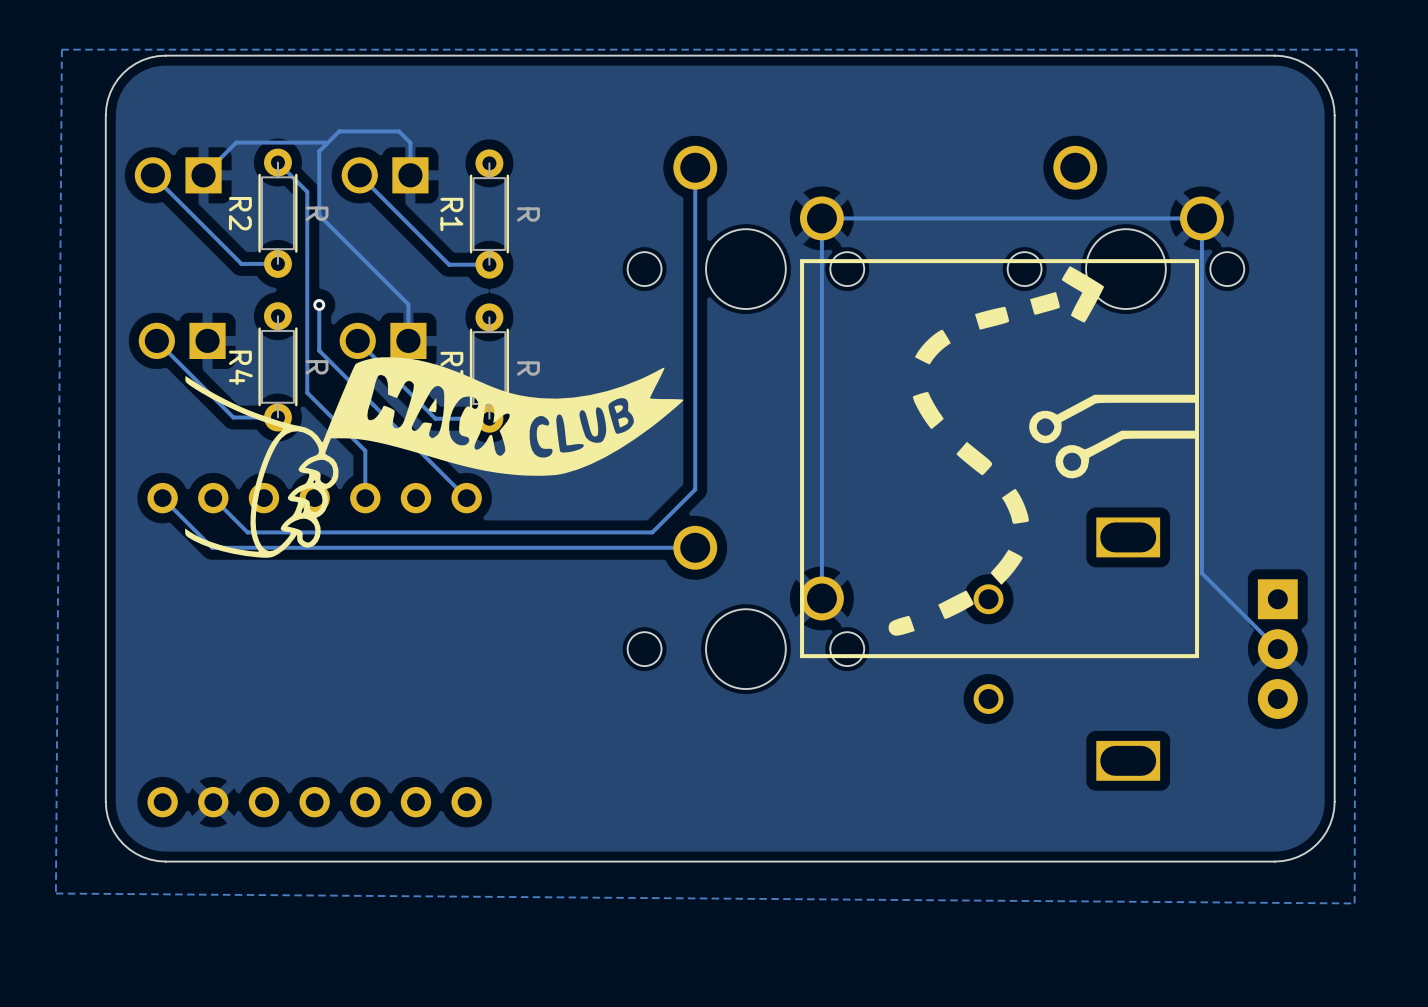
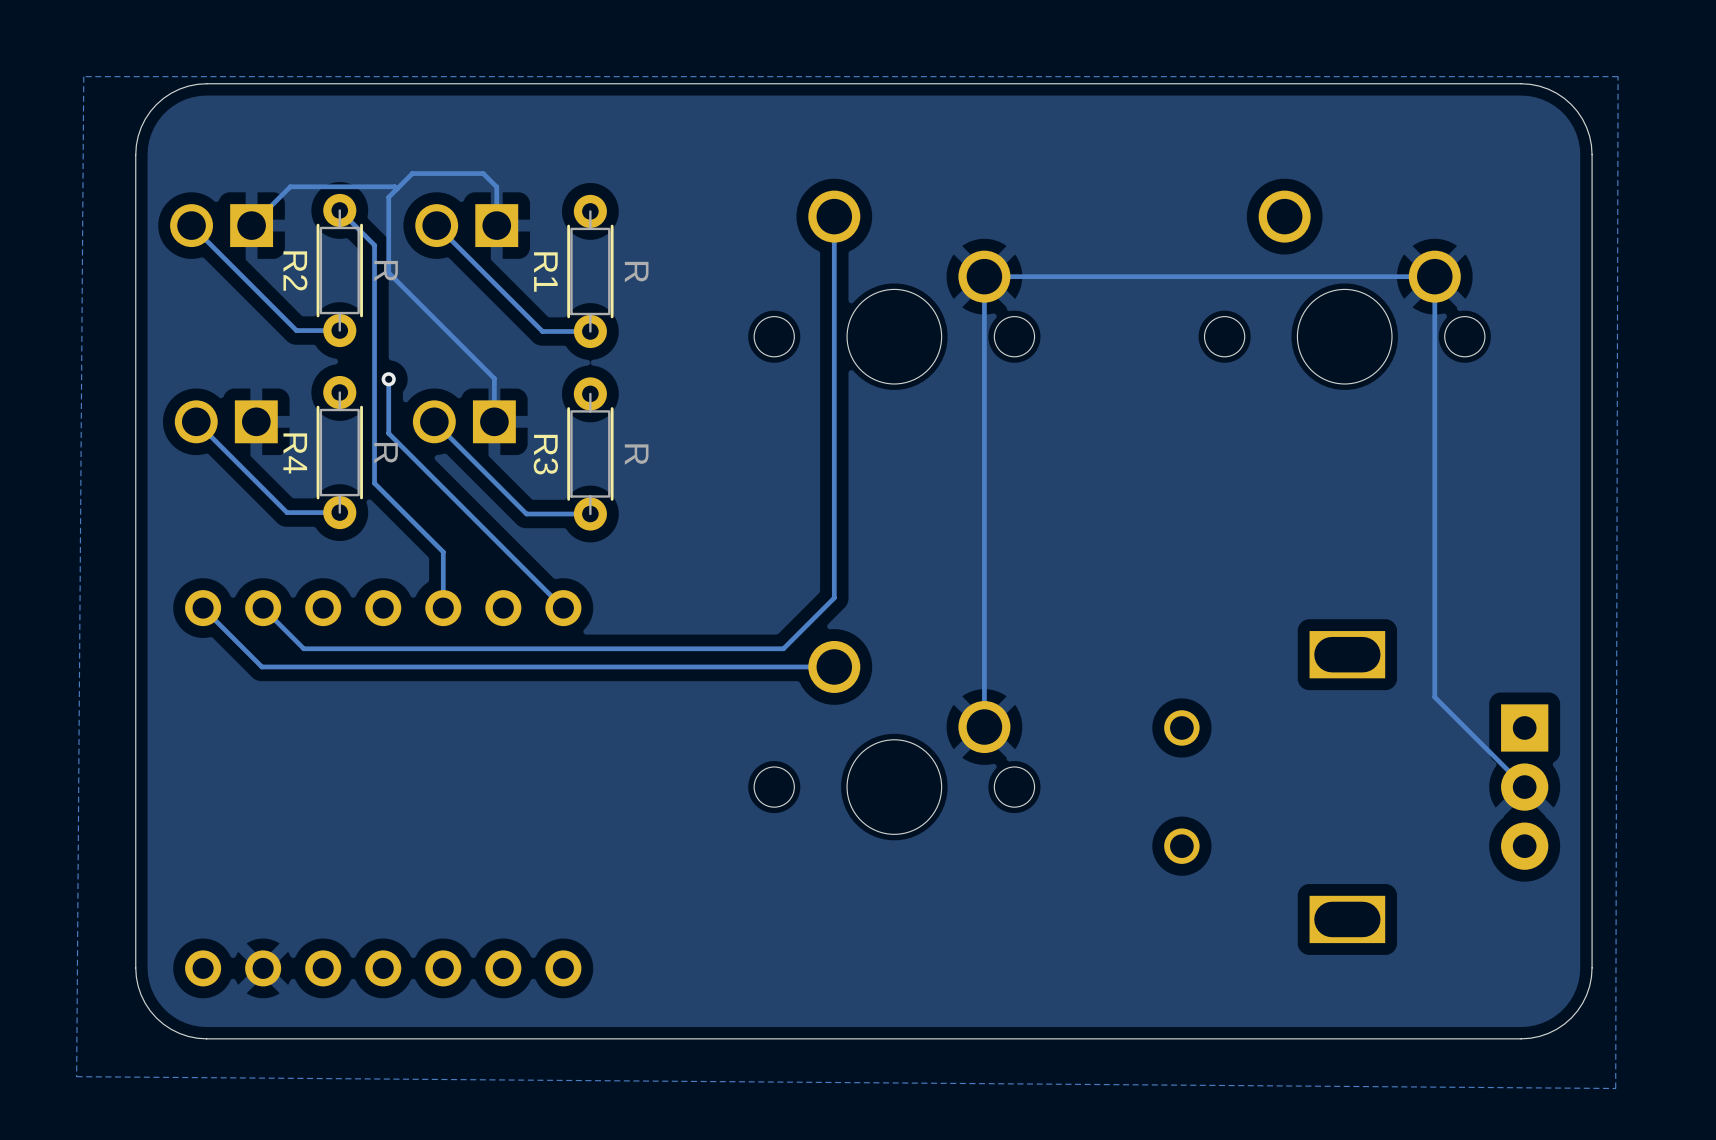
drawing: [800, 259, 1200, 659] -> none
drawing: [185, 357, 684, 558] -> none

